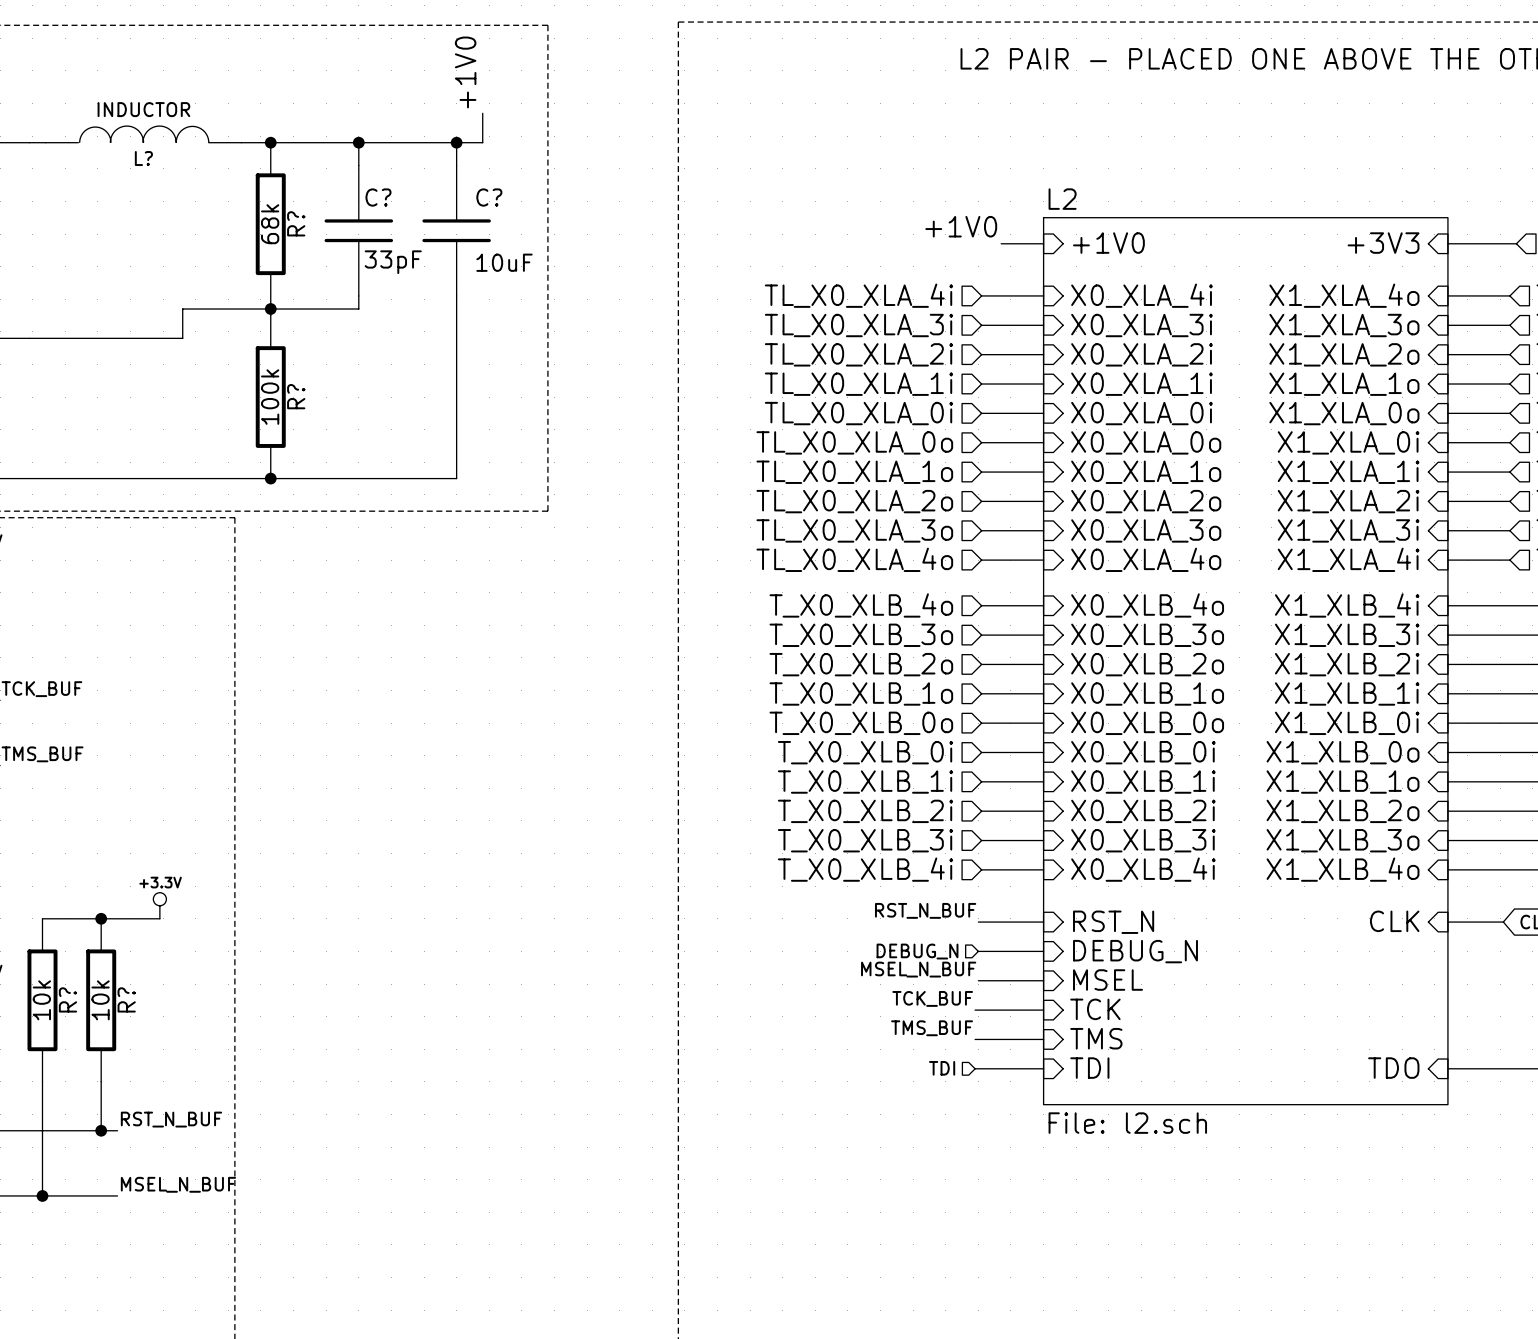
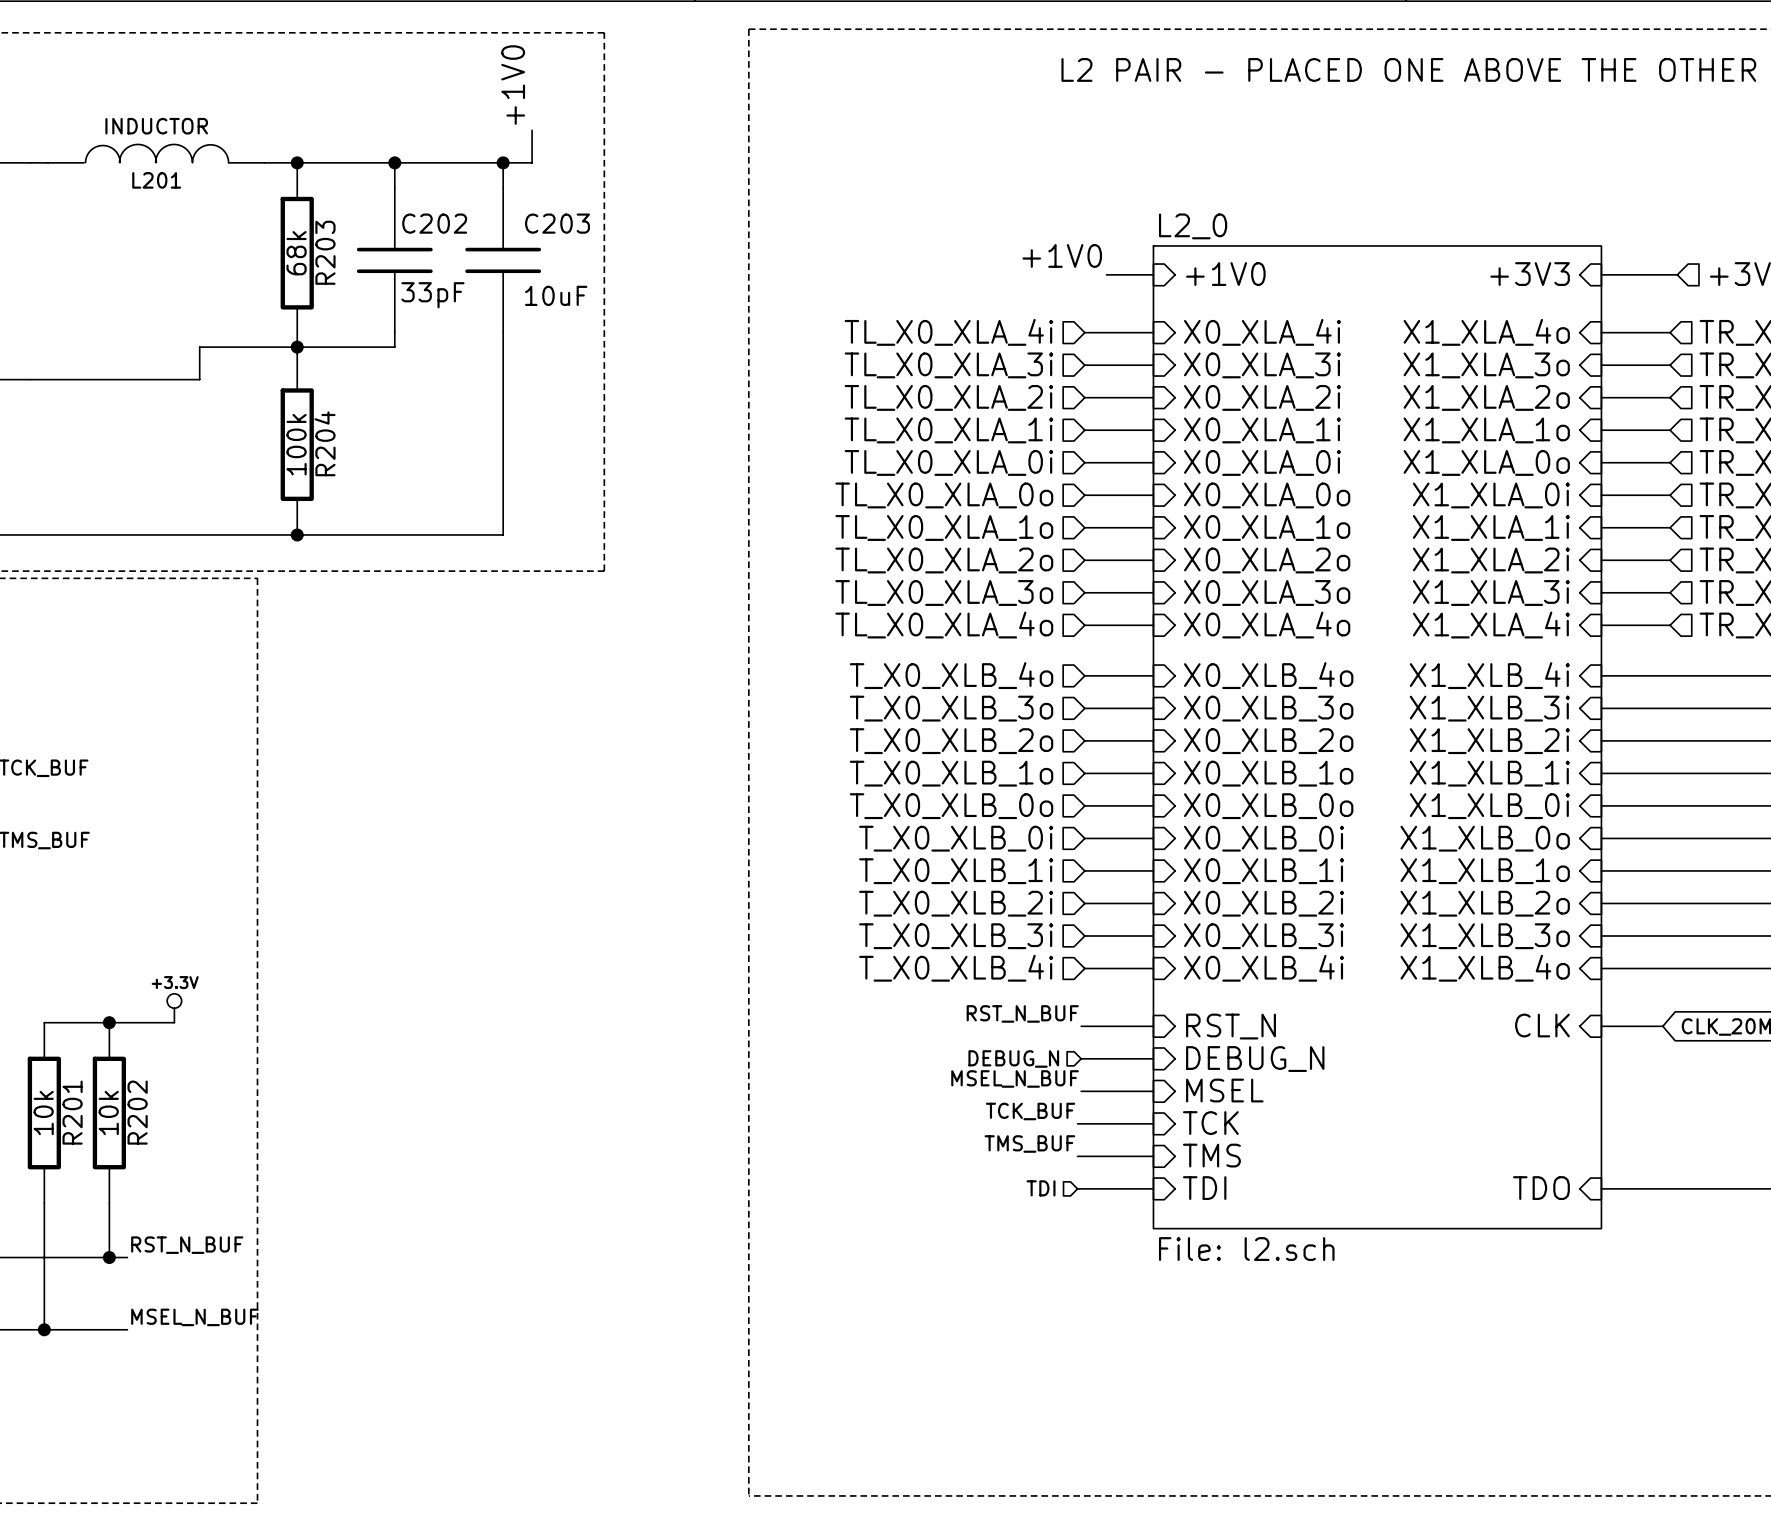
L? name: L? (143, 158) -> L201 (156, 180)
C? name: C? (378, 197) -> C202 (434, 223)
C? name: C? (489, 197) -> C203 (557, 223)
sheet L2 name: L2 (1062, 199) -> L2_0 (1193, 226)
R? name: R? (296, 223) -> R203 (325, 252)
R? name: R? (296, 396) -> R204 (325, 443)
R? name: R? (67, 999) -> R201 (72, 1112)
R? name: R? (126, 999) -> R202 (137, 1112)

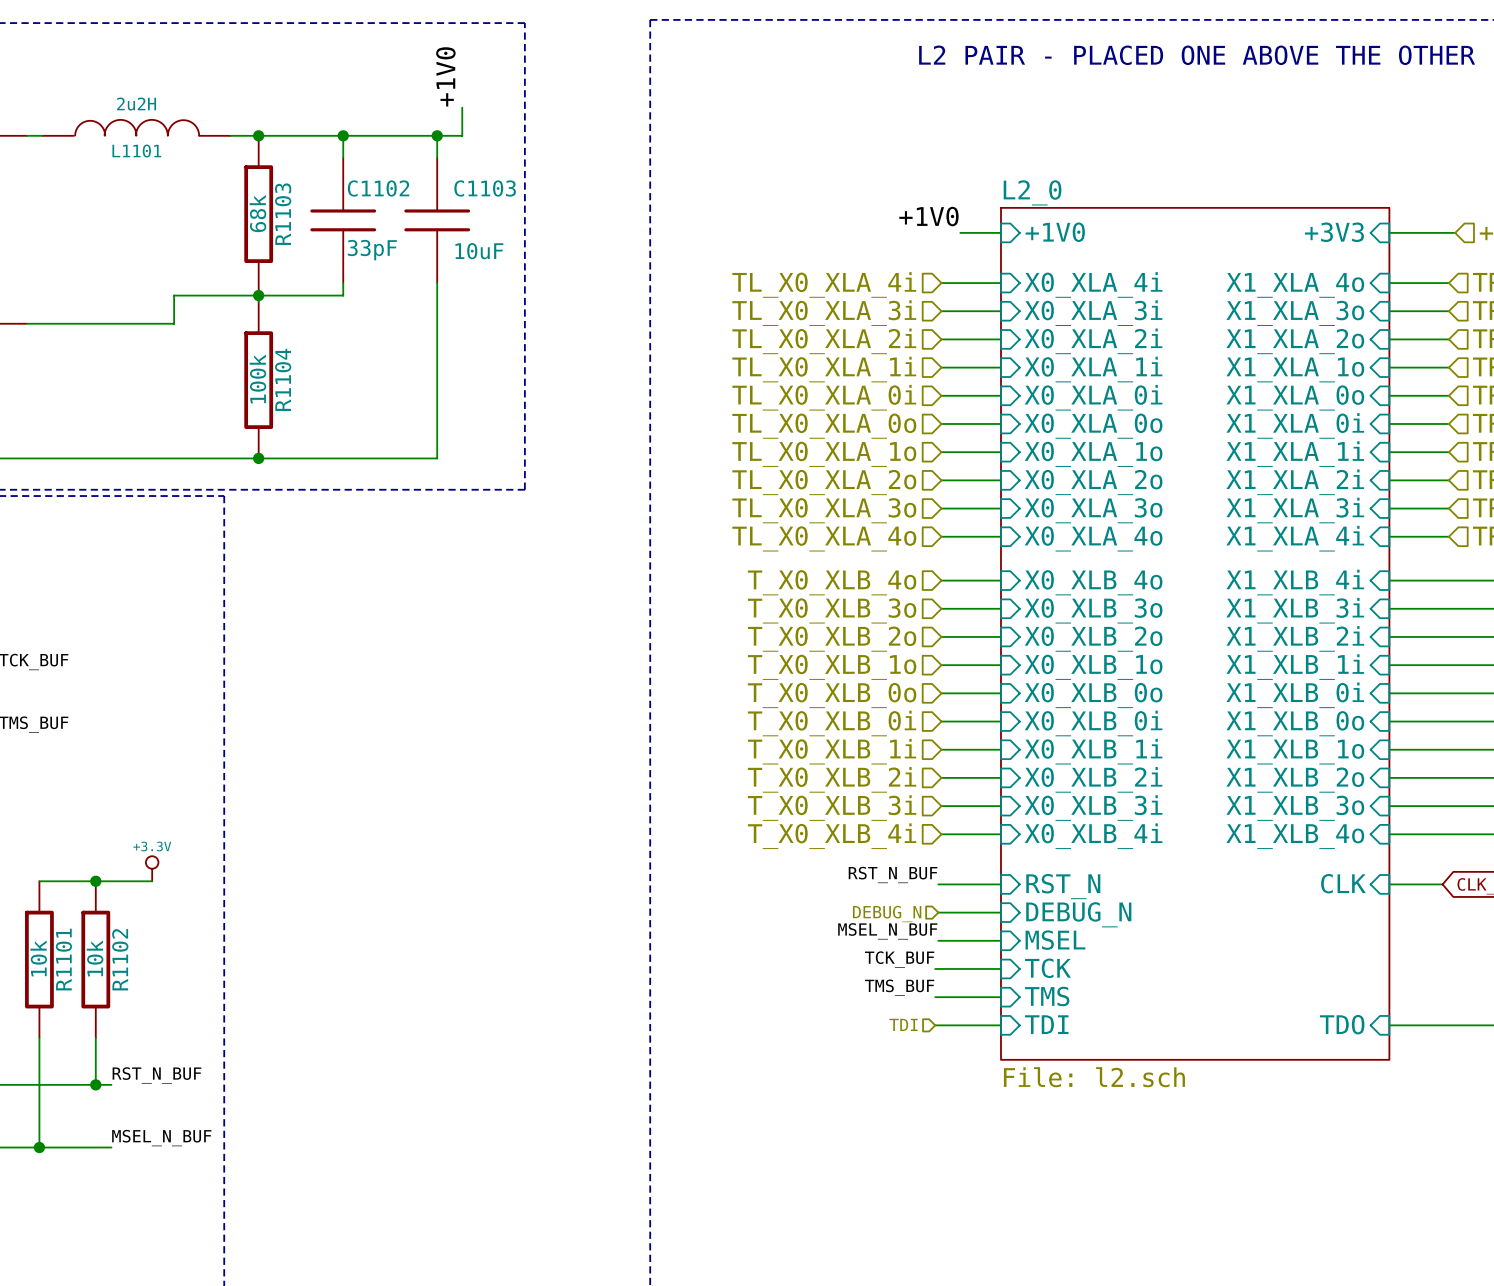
L201 value: INDUCTOR (156, 126) -> 2u2H (136, 104)
L201 name: L201 (156, 180) -> L1101 (136, 151)
C202 name: C202 (434, 223) -> C1102 (378, 188)
C203 name: C203 (557, 223) -> C1103 (485, 188)
R203 name: R203 (325, 252) -> R1103 (283, 214)
R204 name: R204 (325, 443) -> R1104 (283, 379)
R201 name: R201 (72, 1112) -> R1101 (63, 959)
R202 name: R202 (137, 1112) -> R1102 (120, 959)

